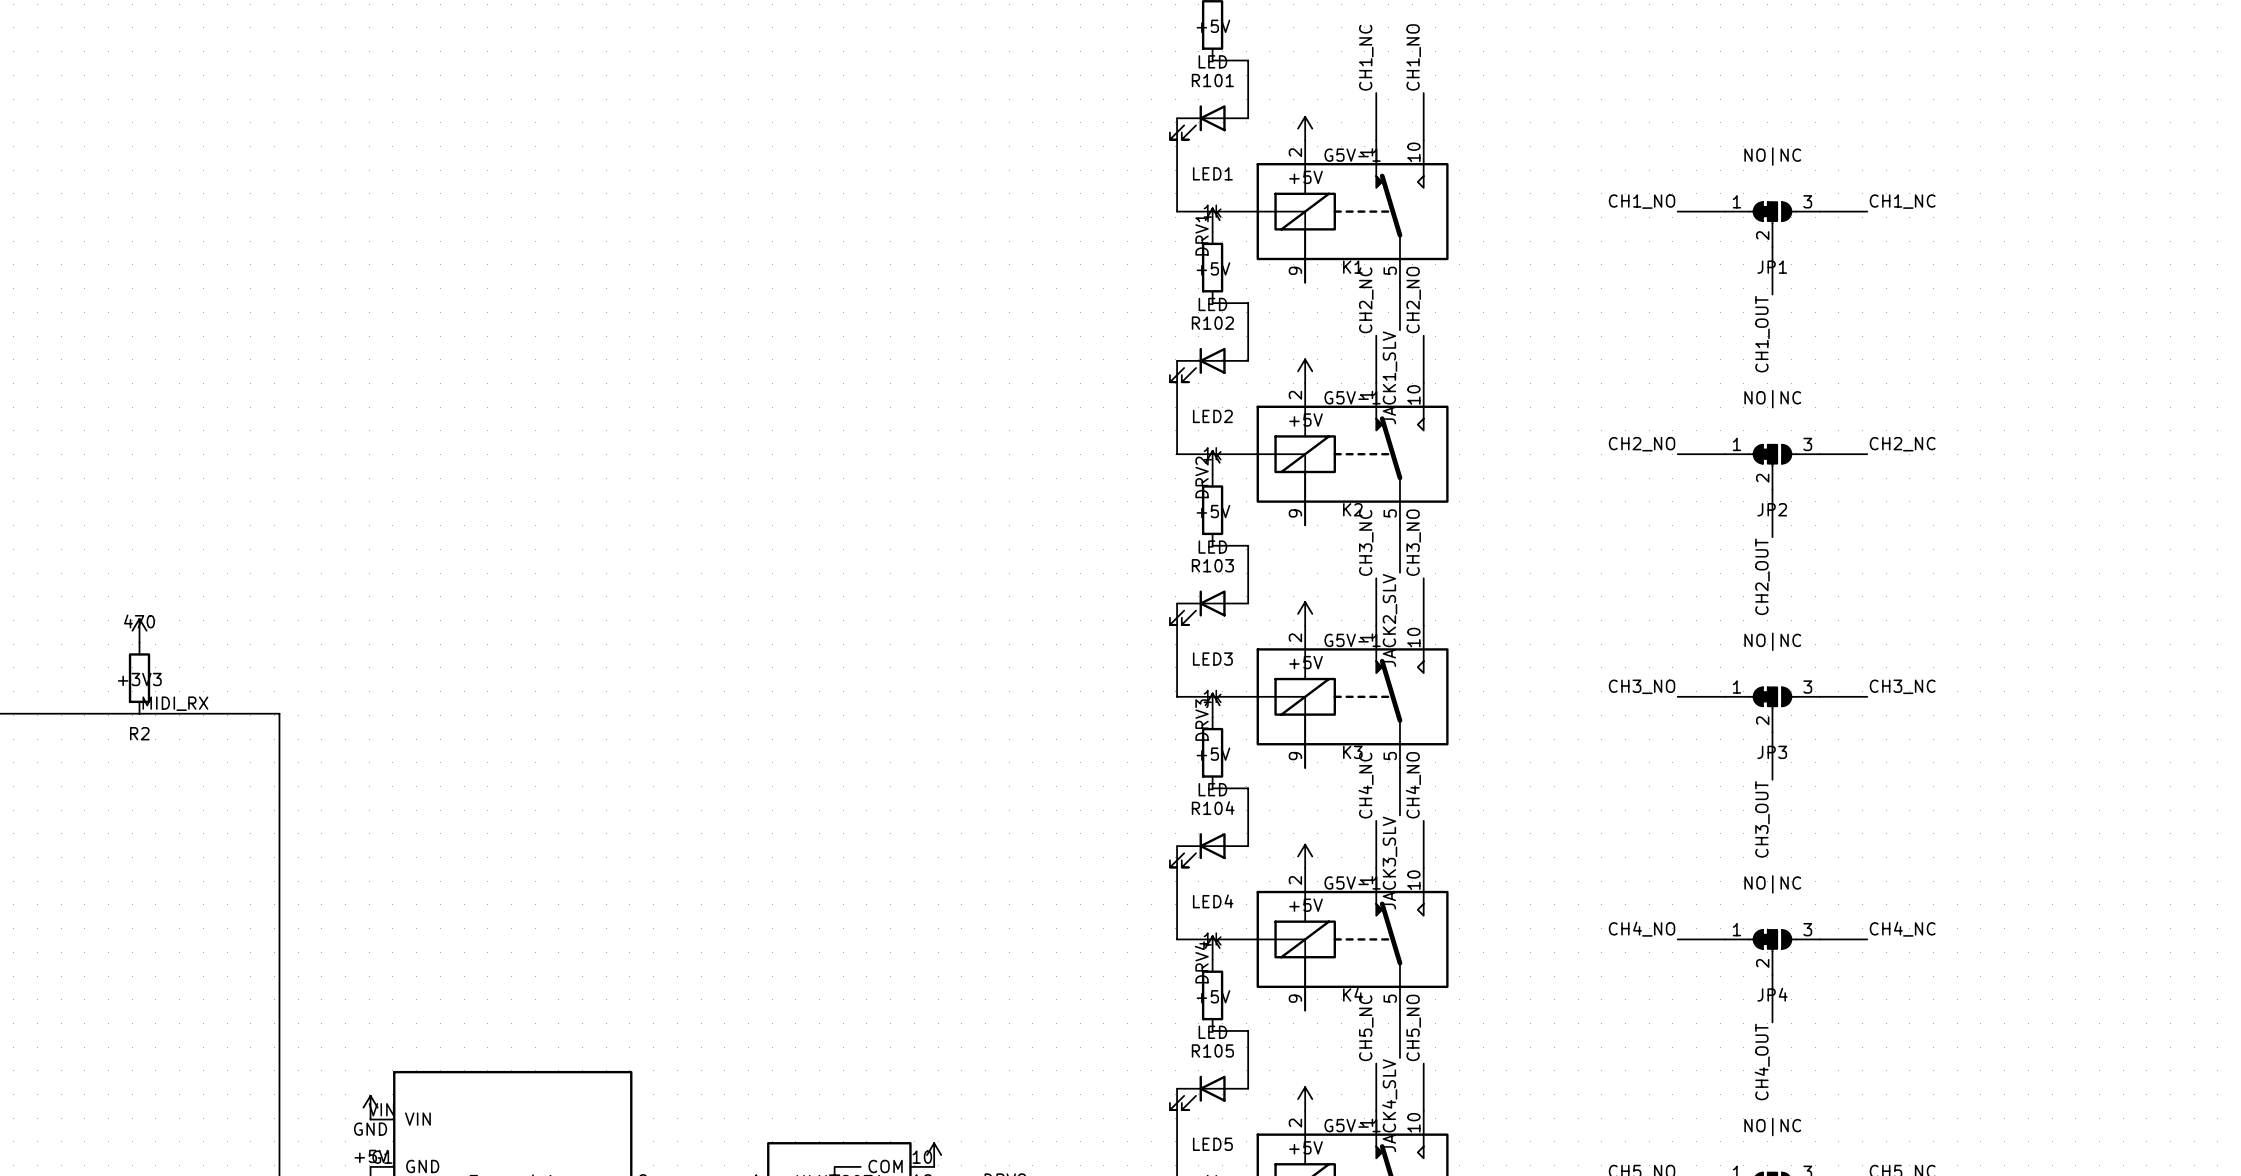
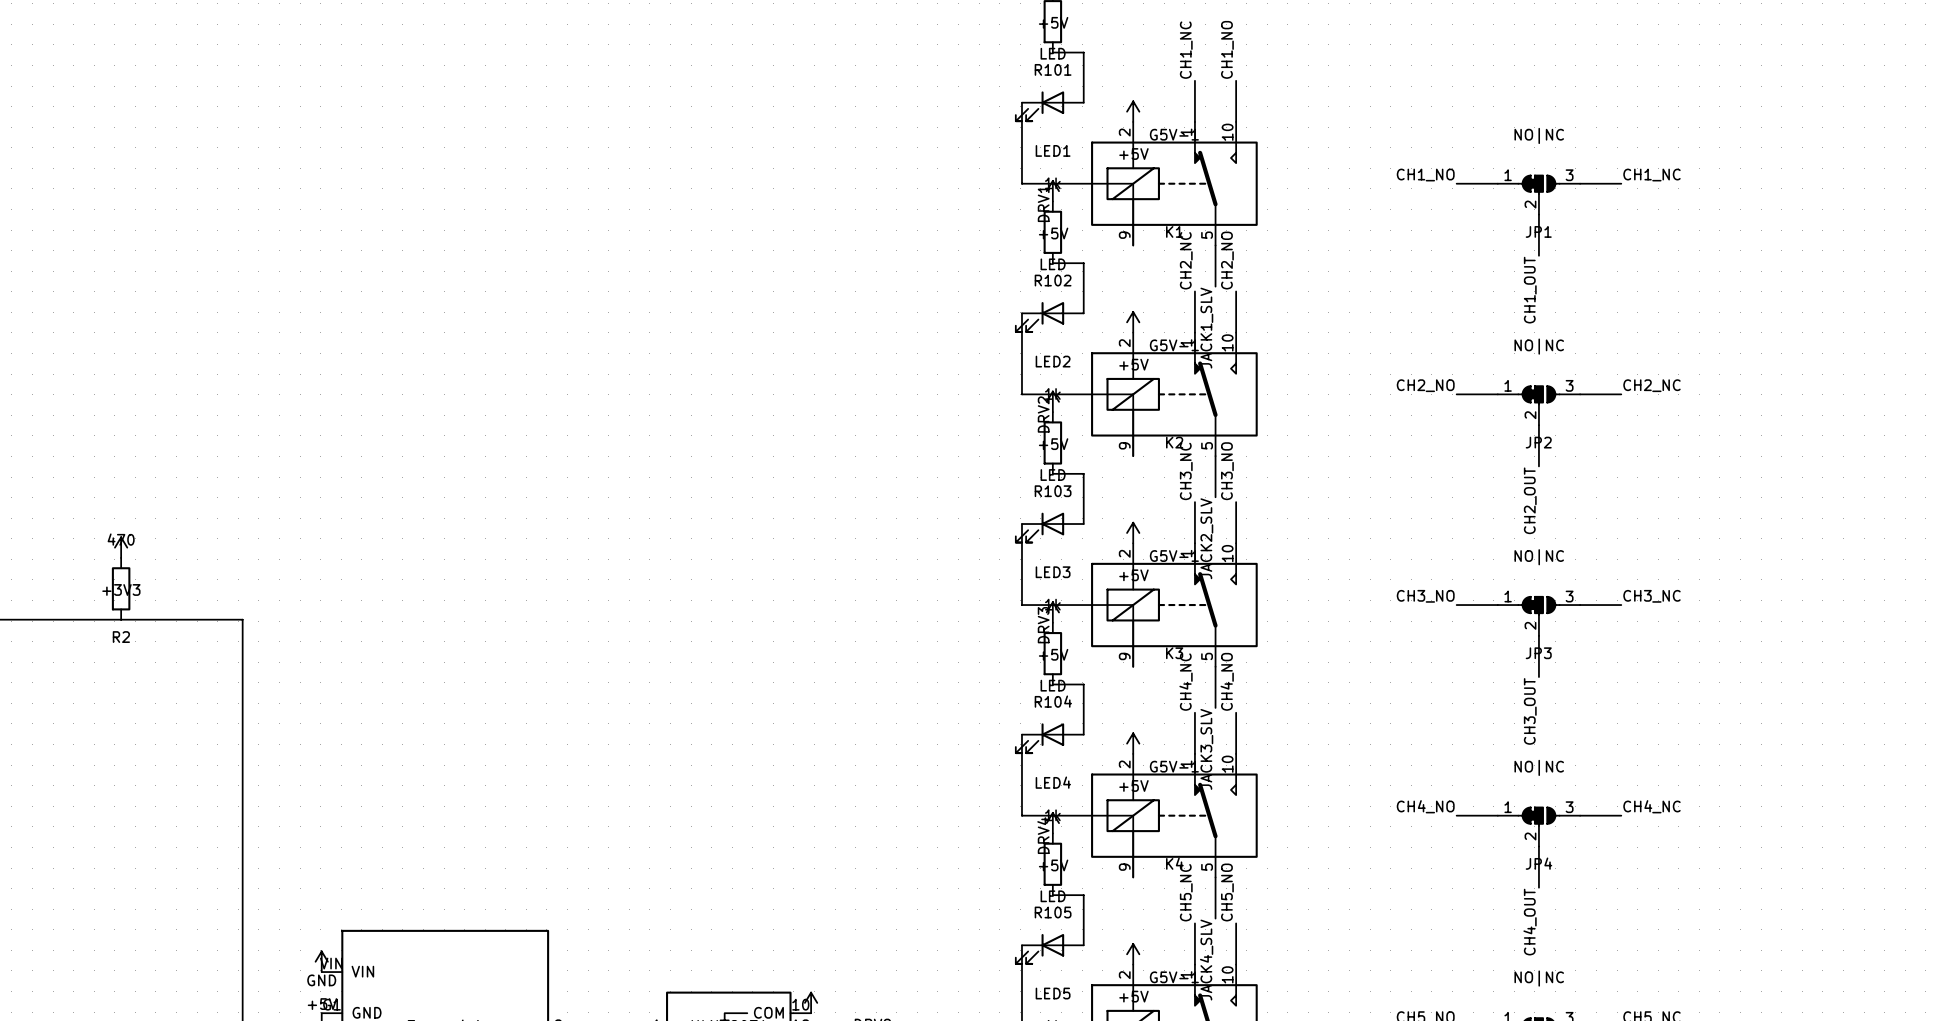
label: MIDI_RX (175, 703) -> none

